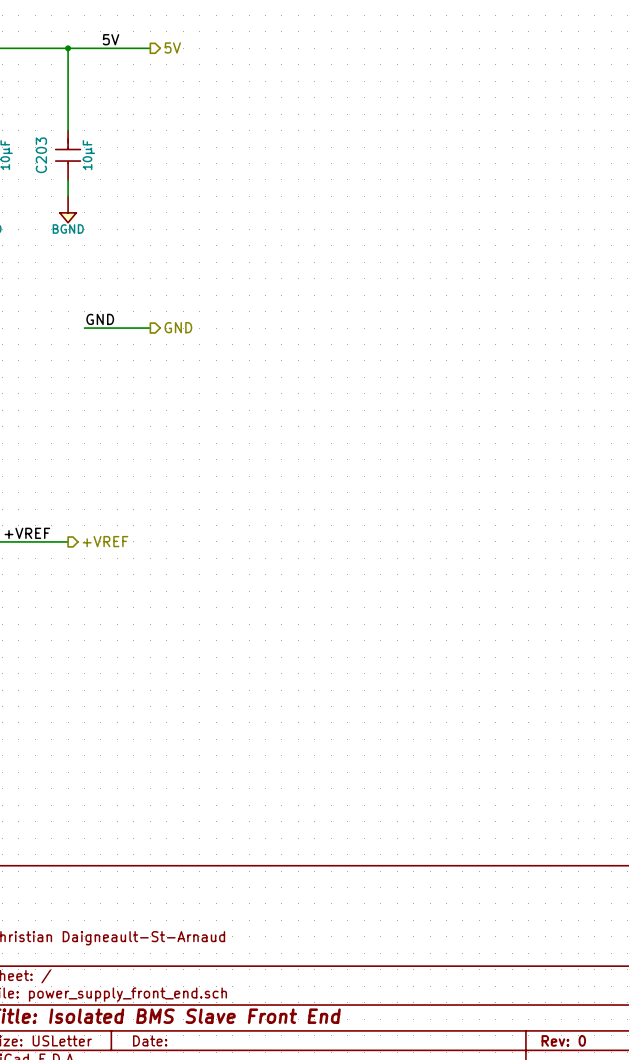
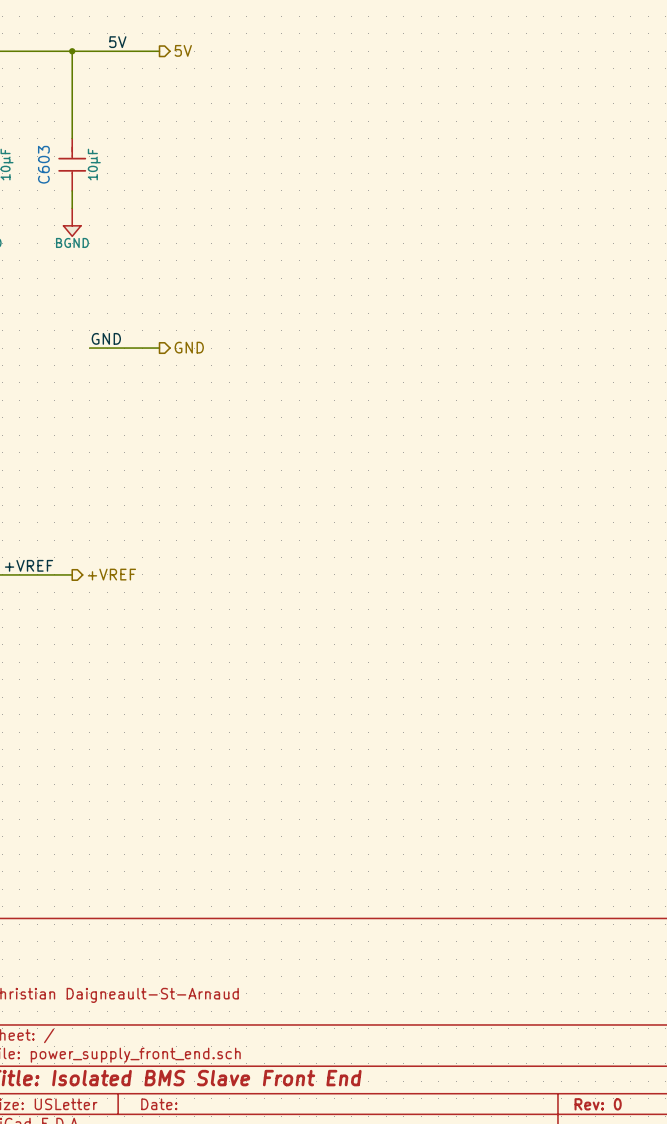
C203 name: C203 (41, 155) -> C603 (43, 164)

